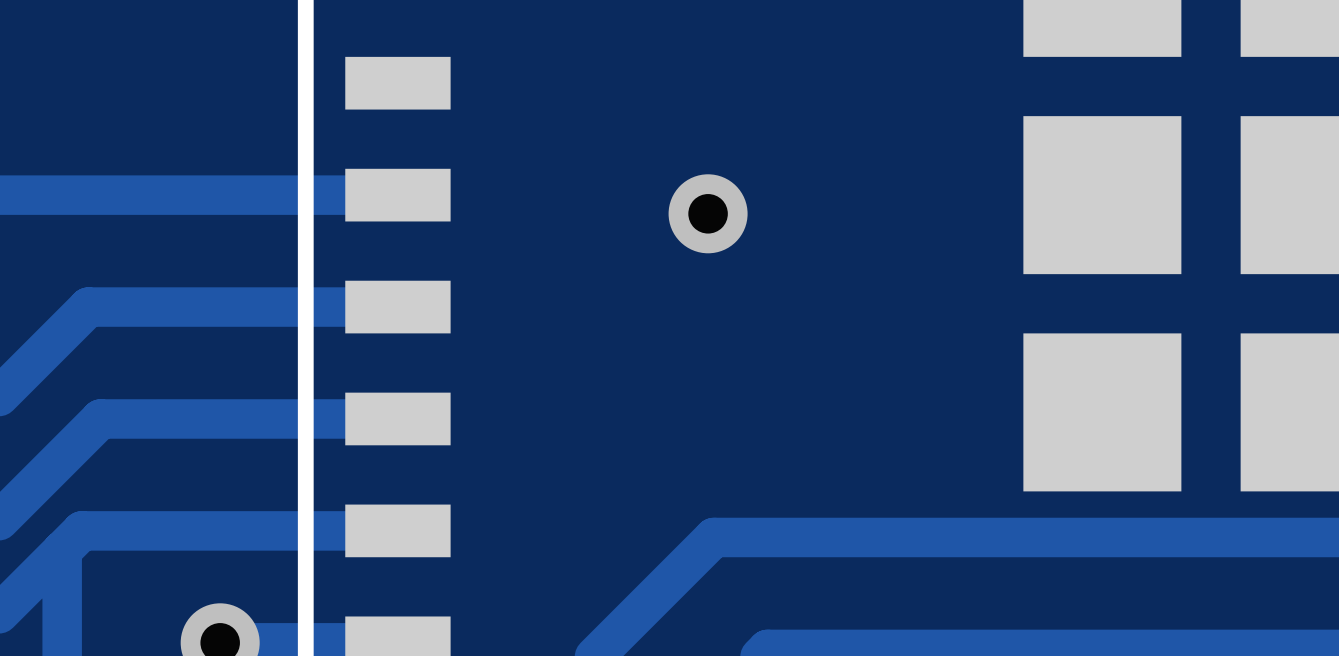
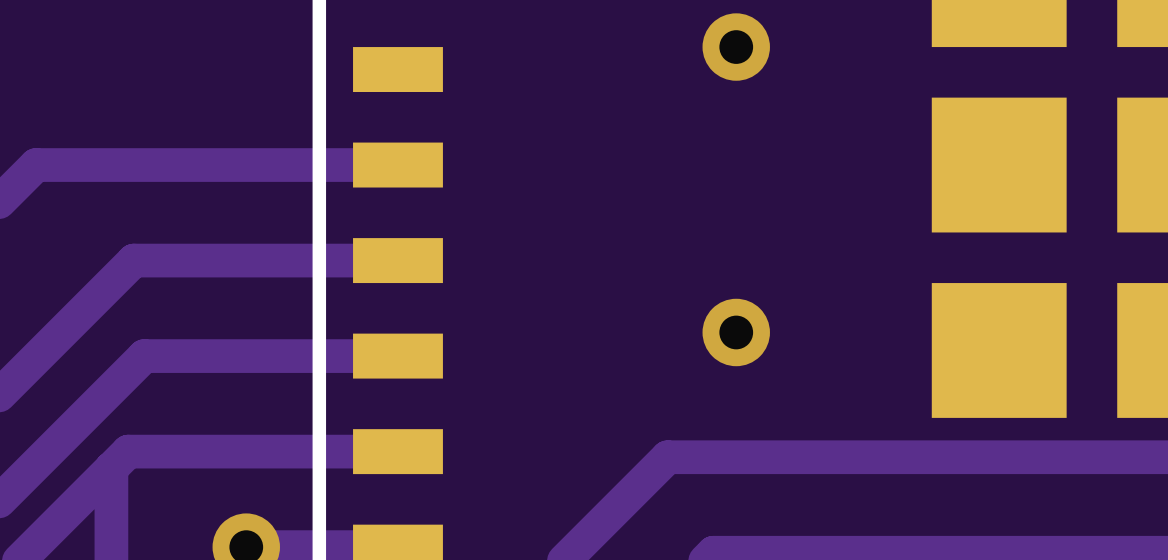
via: none -> (736, 47)
via: (708, 213) -> none
via: none -> (736, 332)

